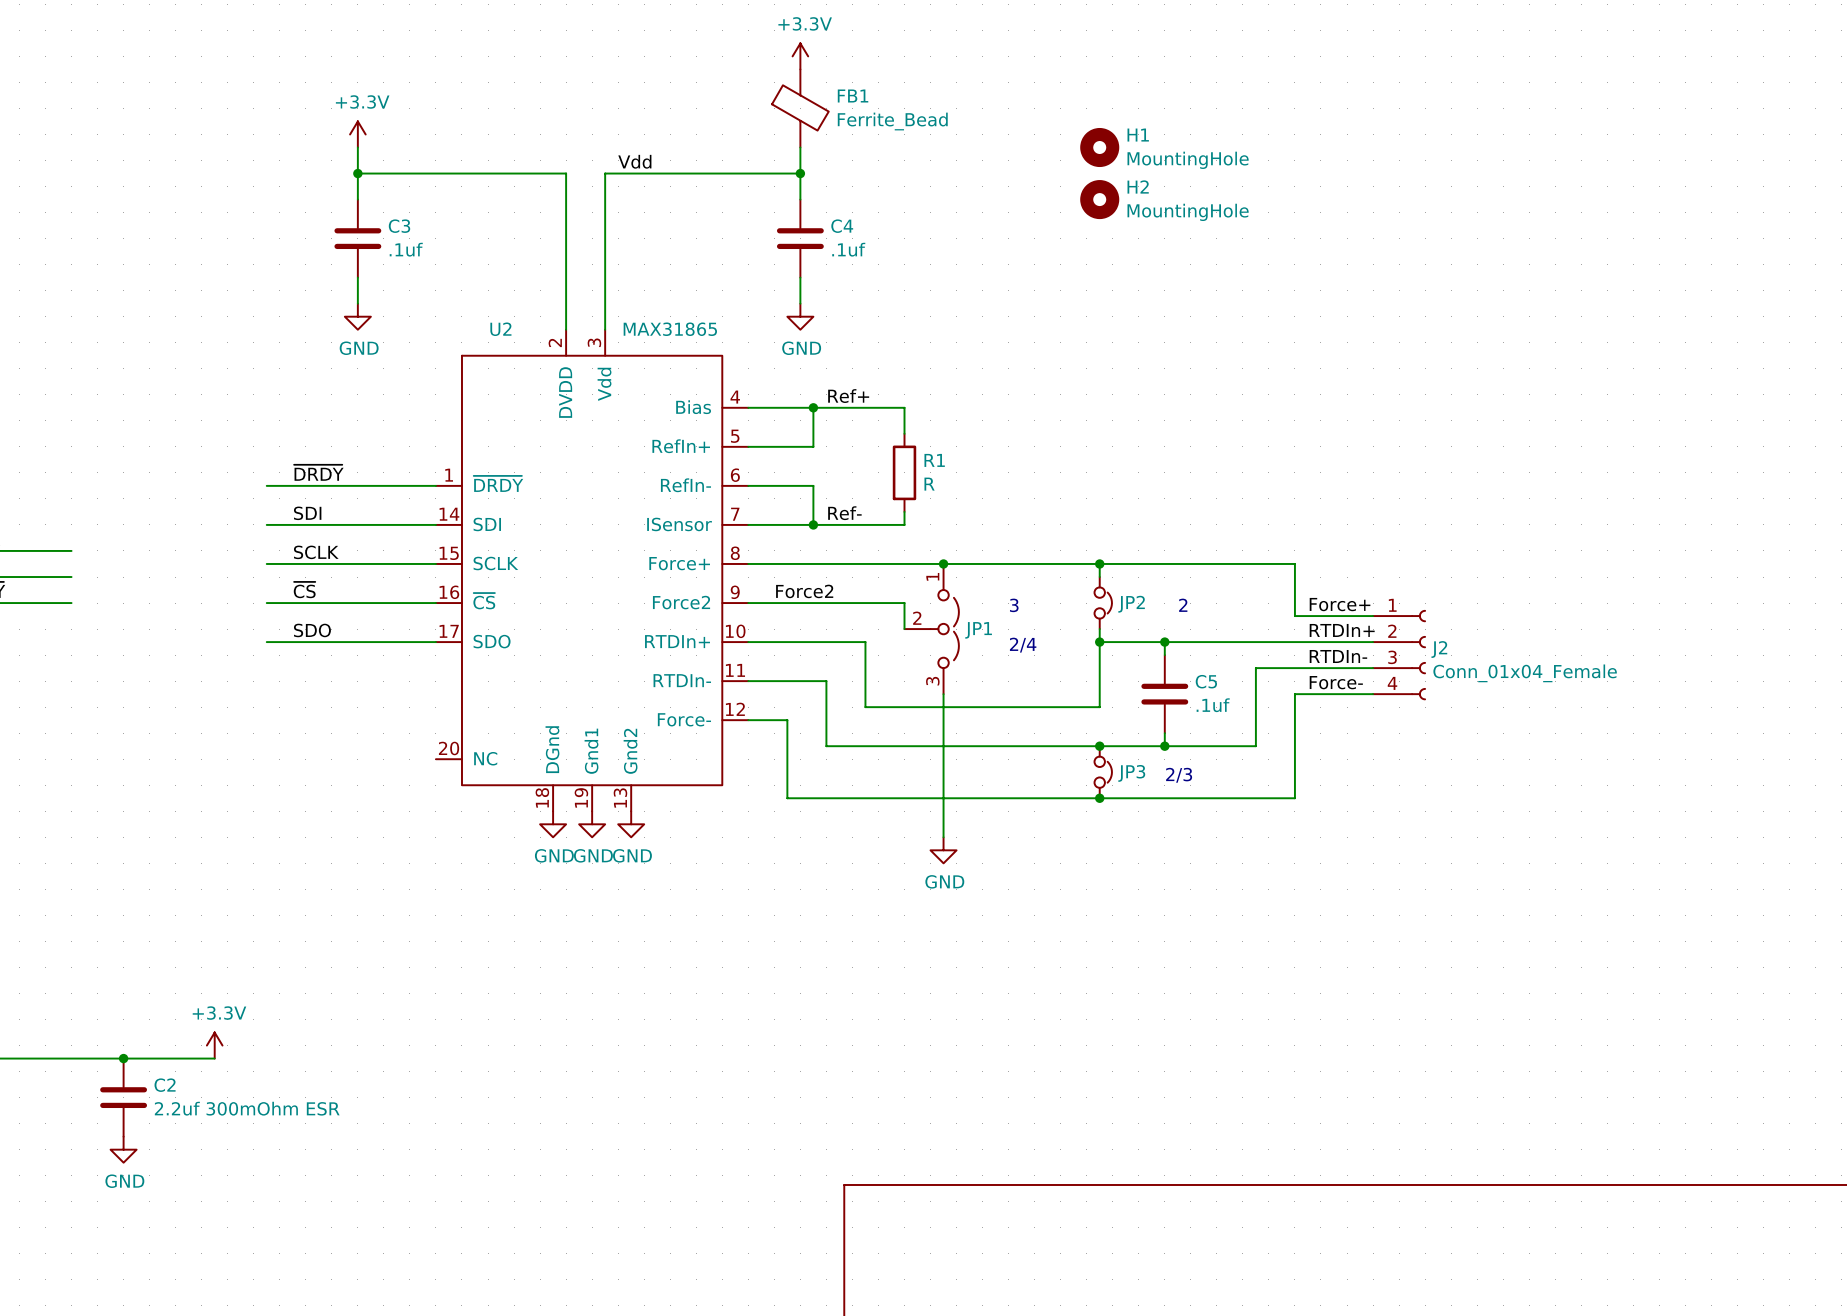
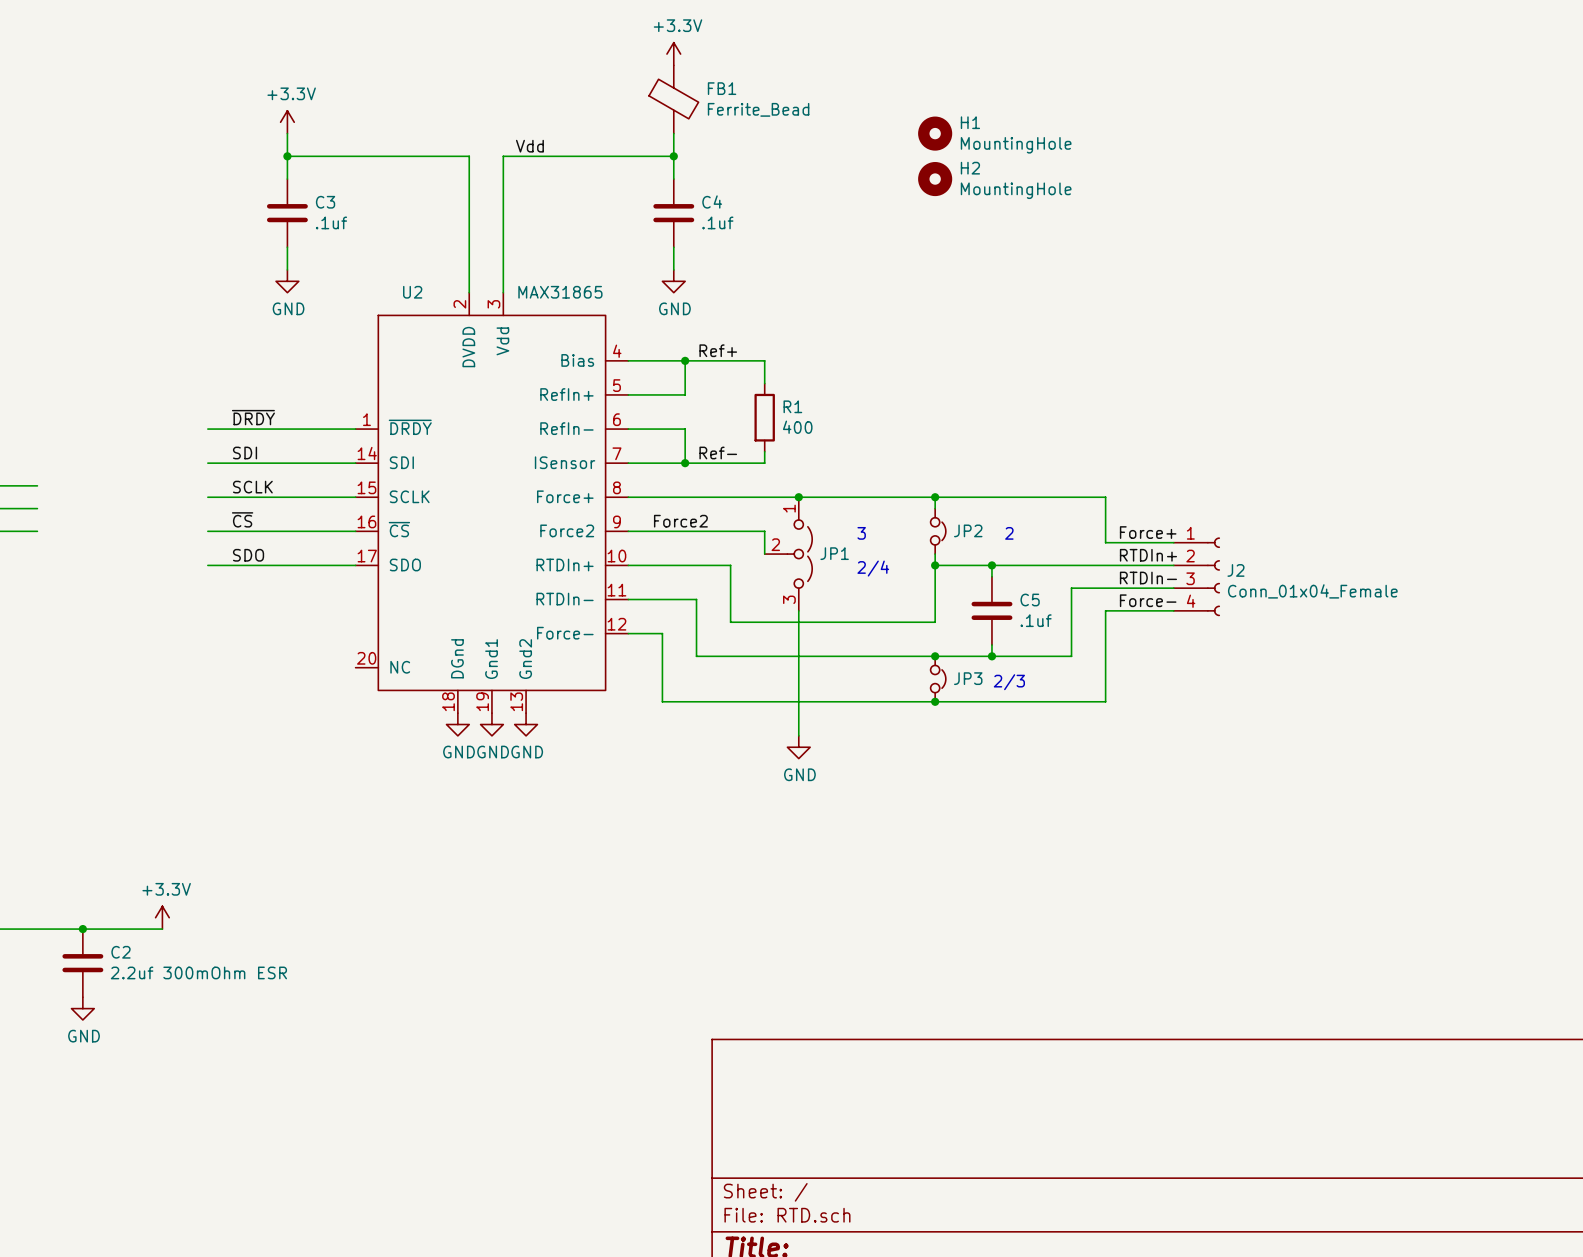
R1 value: R (929, 484) -> 400 (797, 427)

